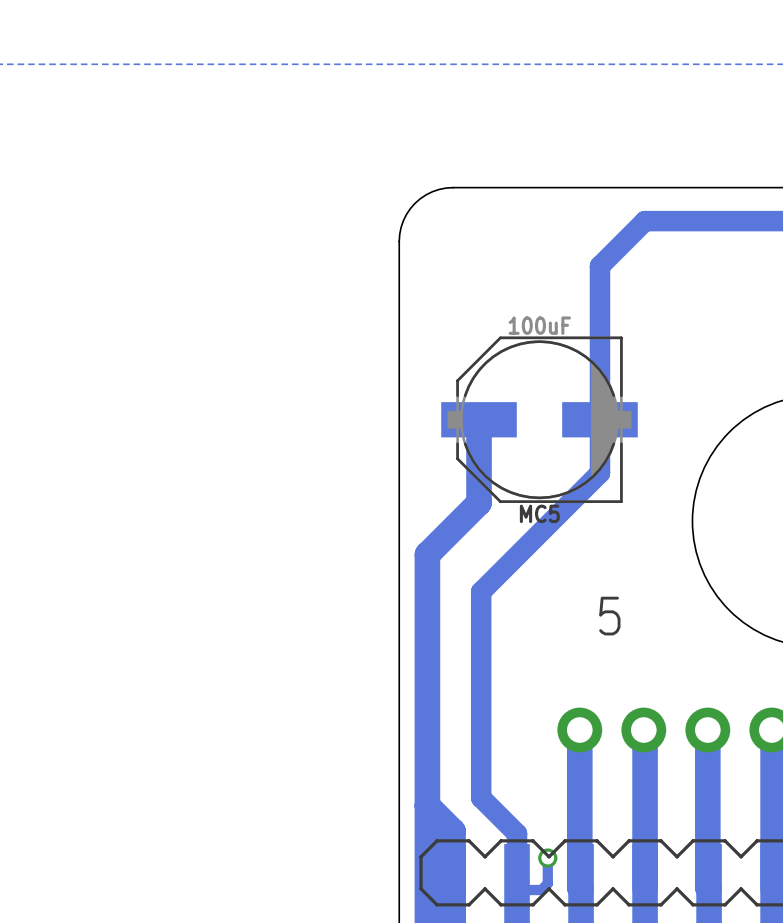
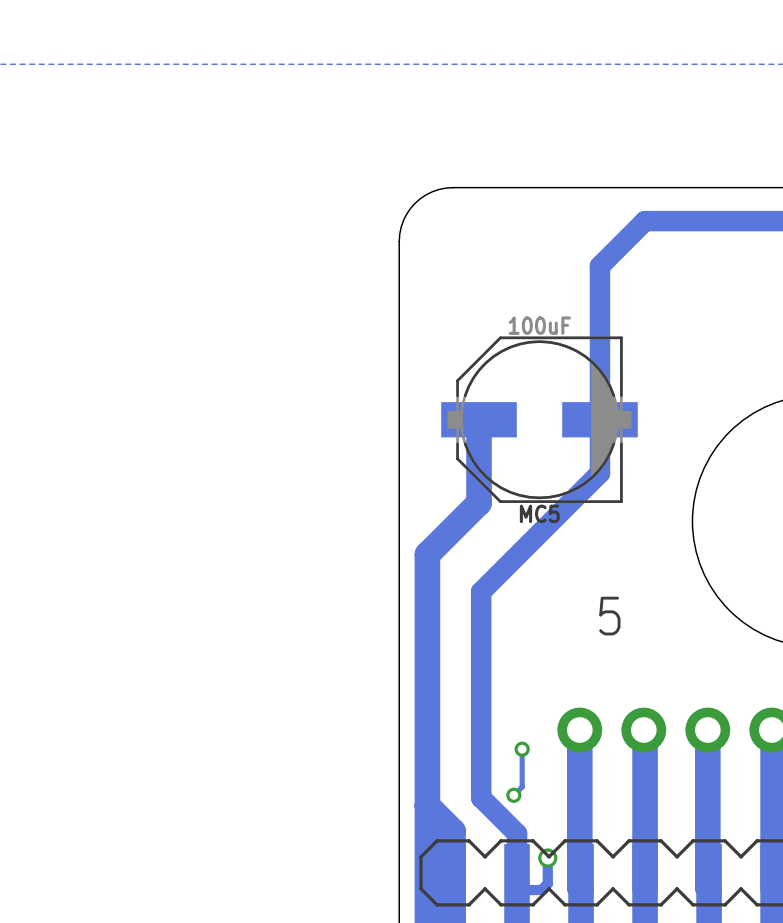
track: none -> (522, 749) (522, 786) (513, 795)
via: none -> (522, 749)
via: none -> (513, 795)

